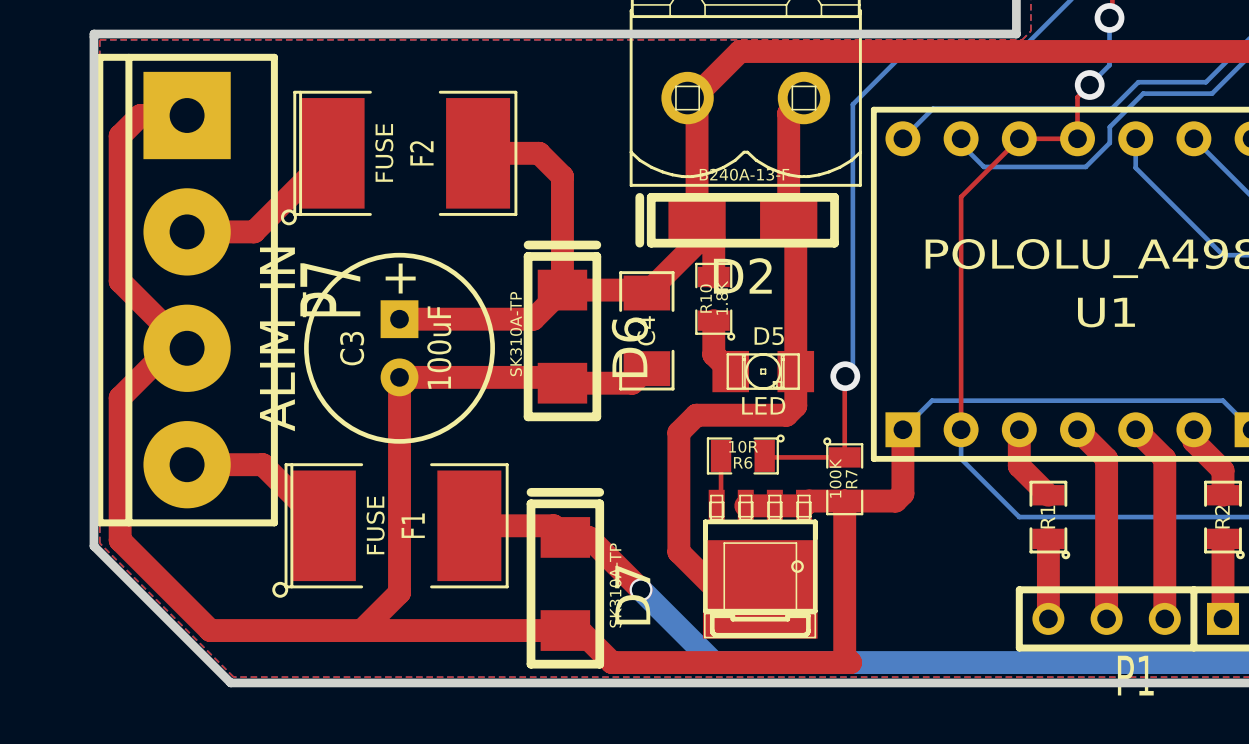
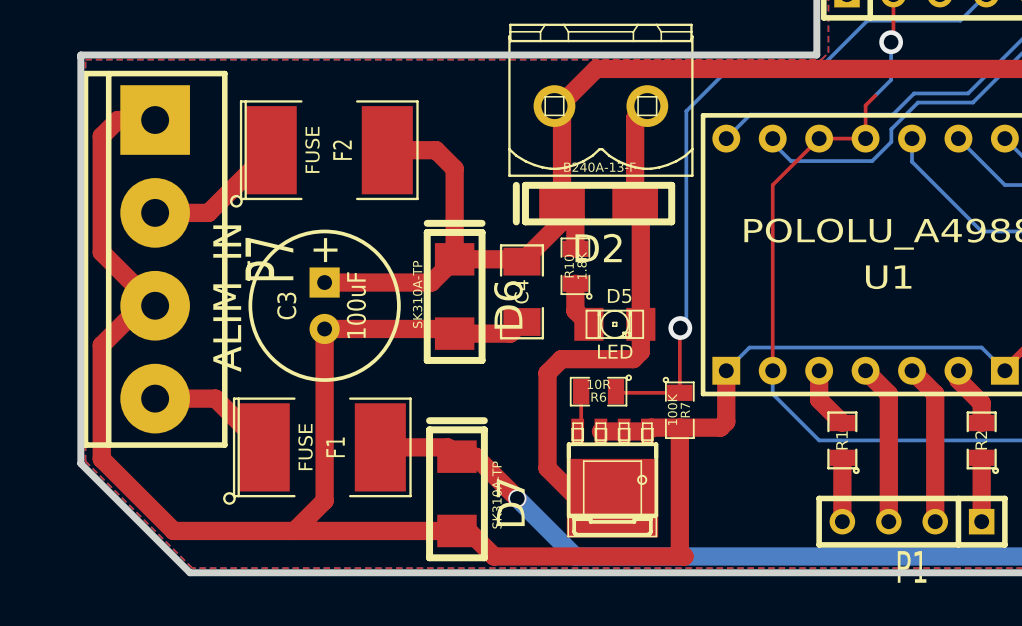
via: (1089, 85) -> none

